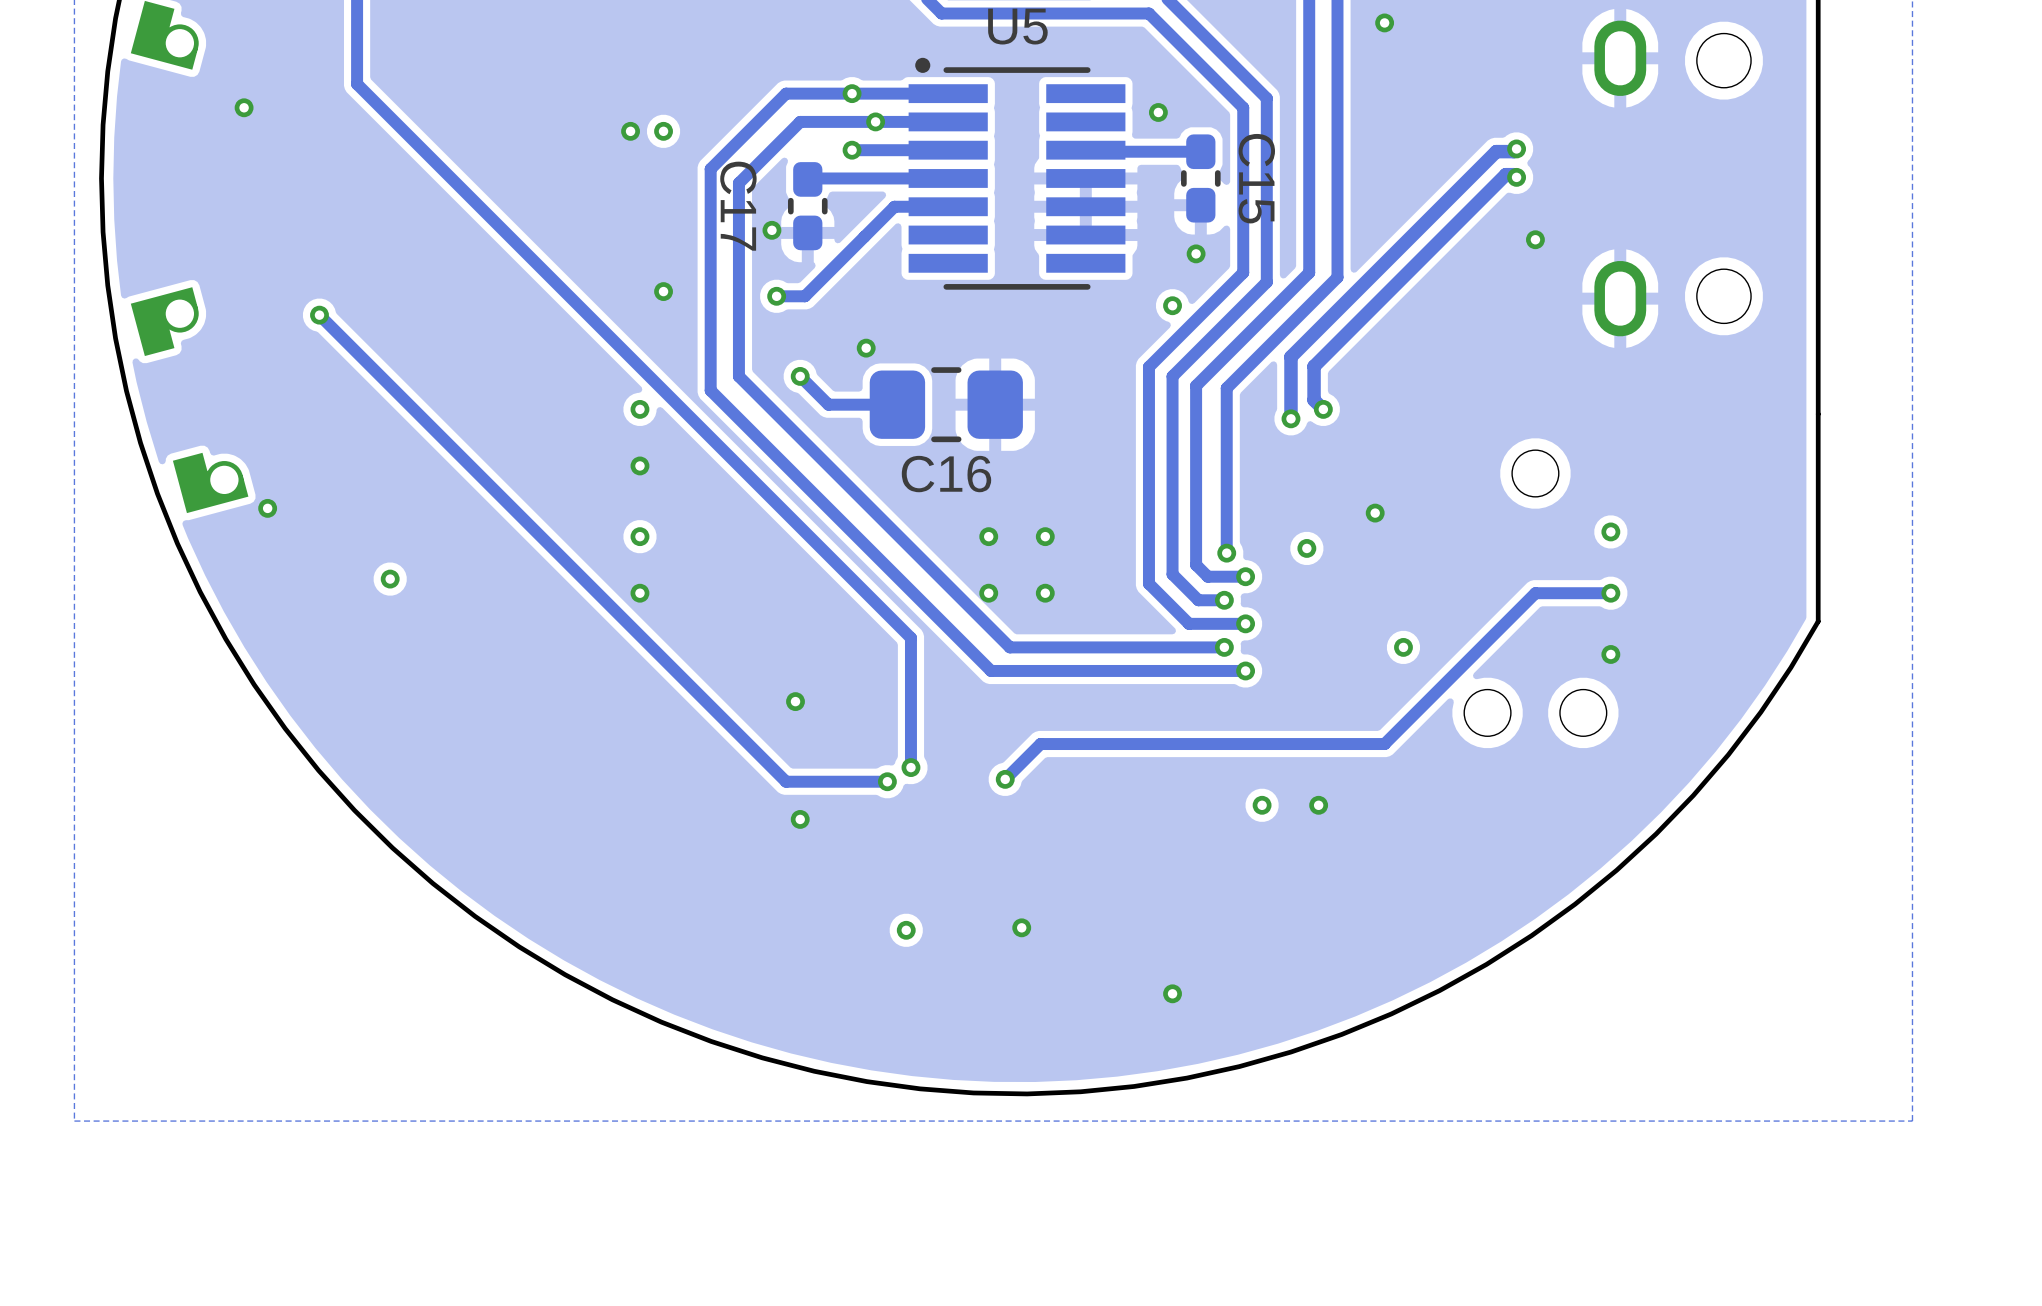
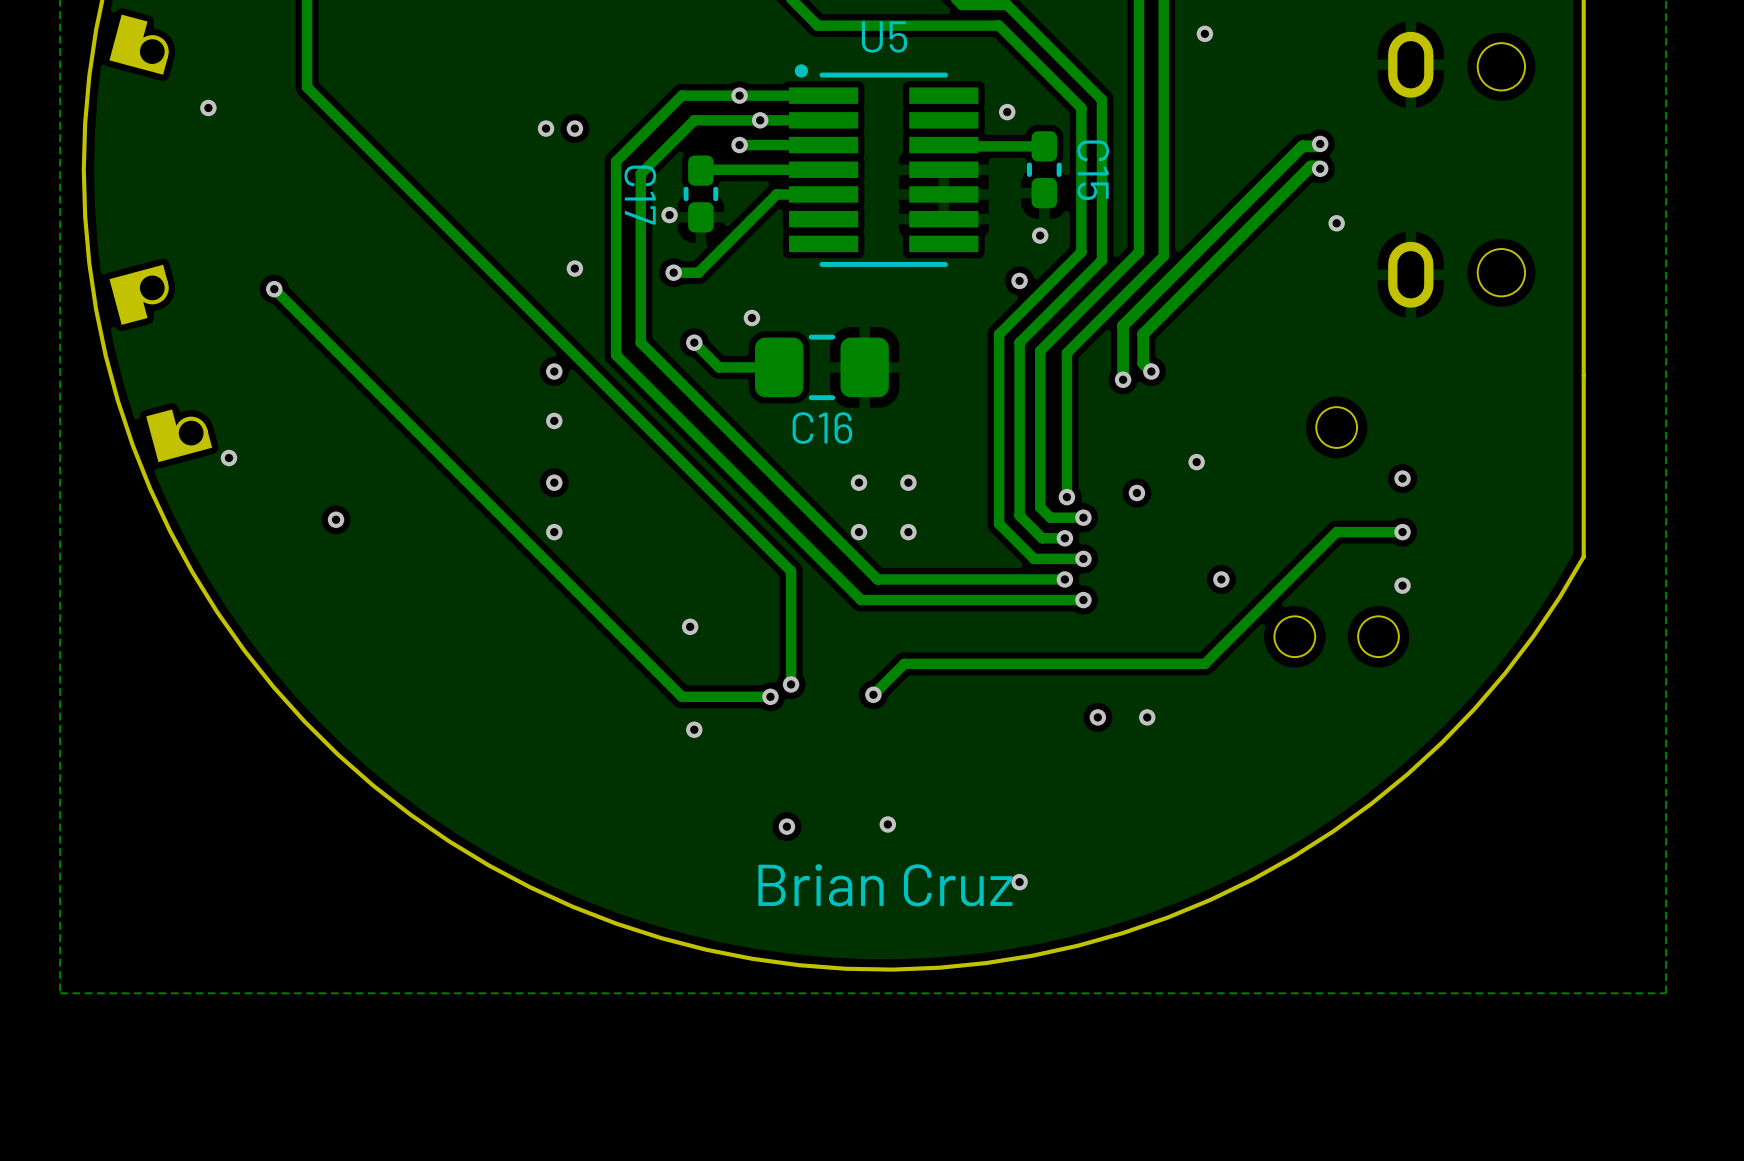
text: none -> Brian Cruz (885, 885)

